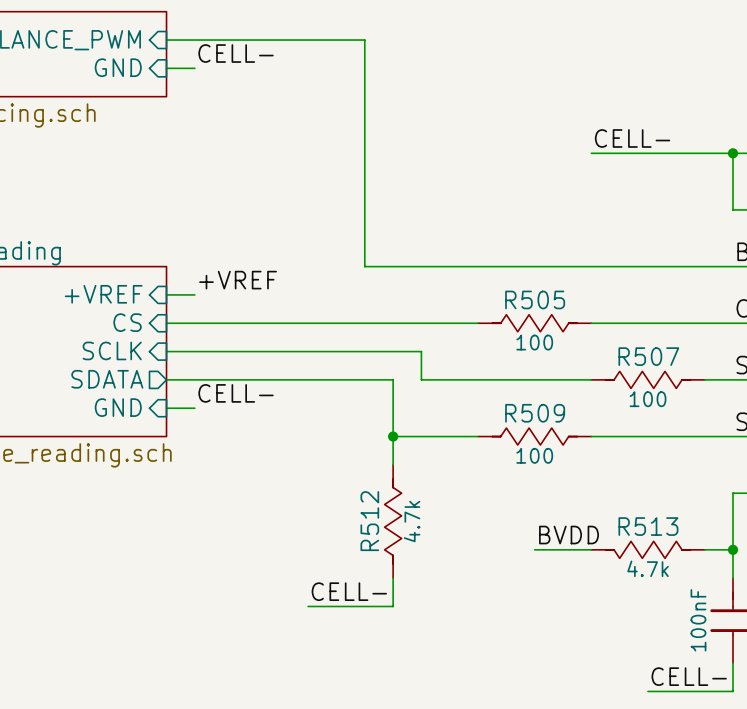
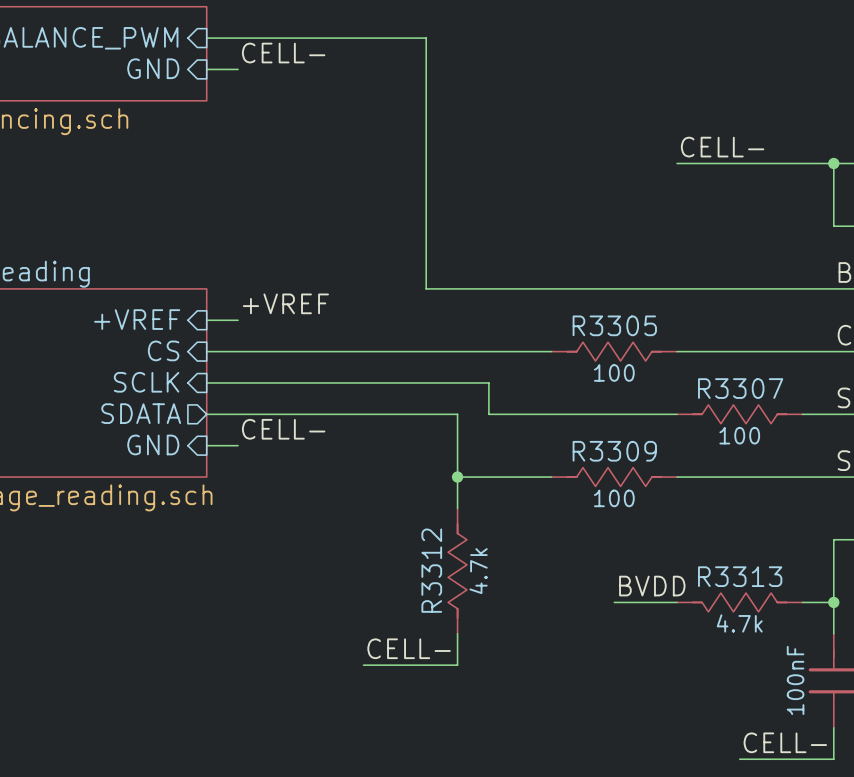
R505 name: R505 (535, 299) -> R3305 (614, 325)
R507 name: R507 (648, 356) -> R3307 (740, 388)
R509 name: R509 (535, 413) -> R3309 (614, 451)
R512 name: R512 (369, 521) -> R3312 (431, 570)
R513 name: R513 (648, 526) -> R3313 (740, 576)

